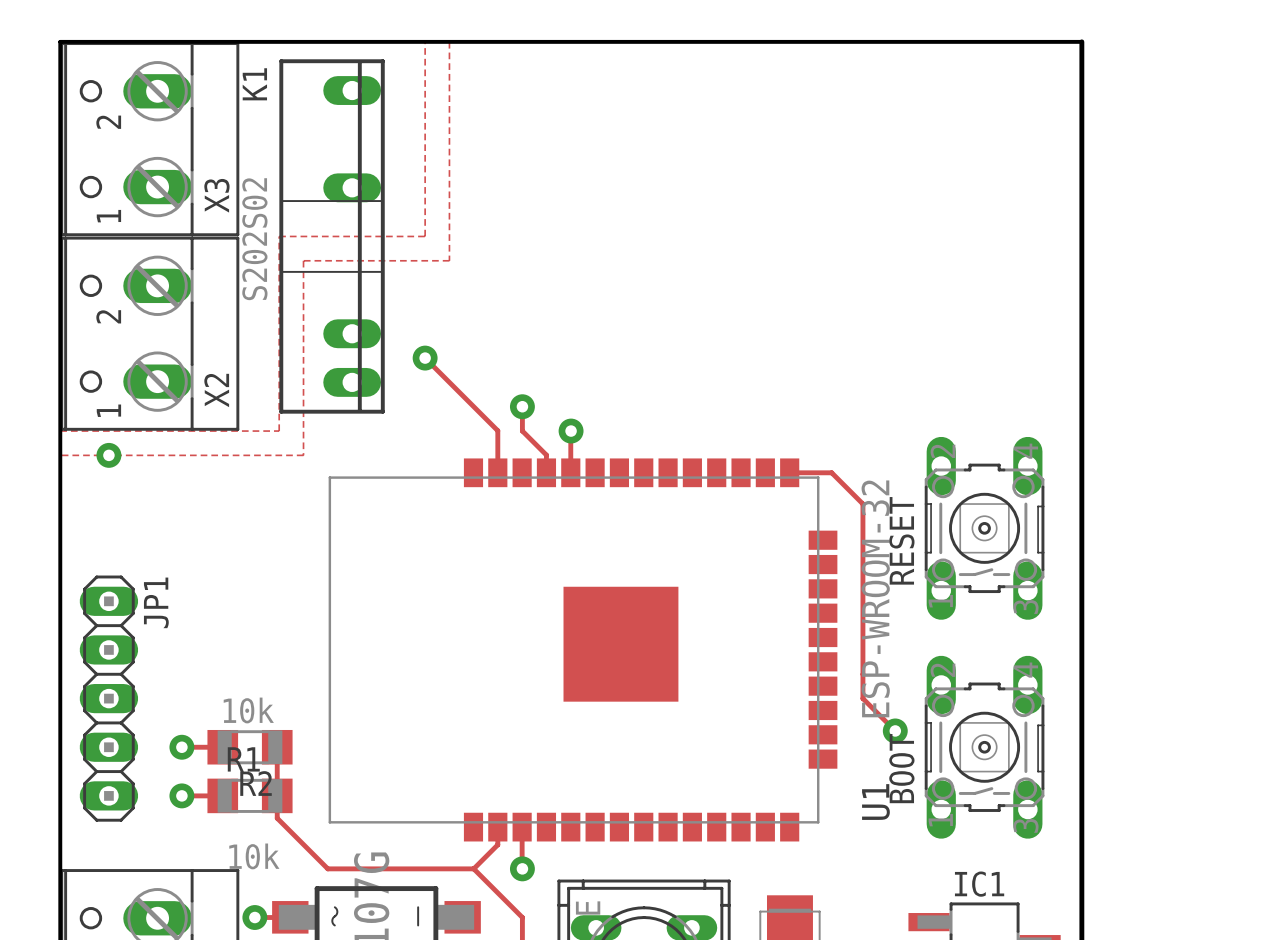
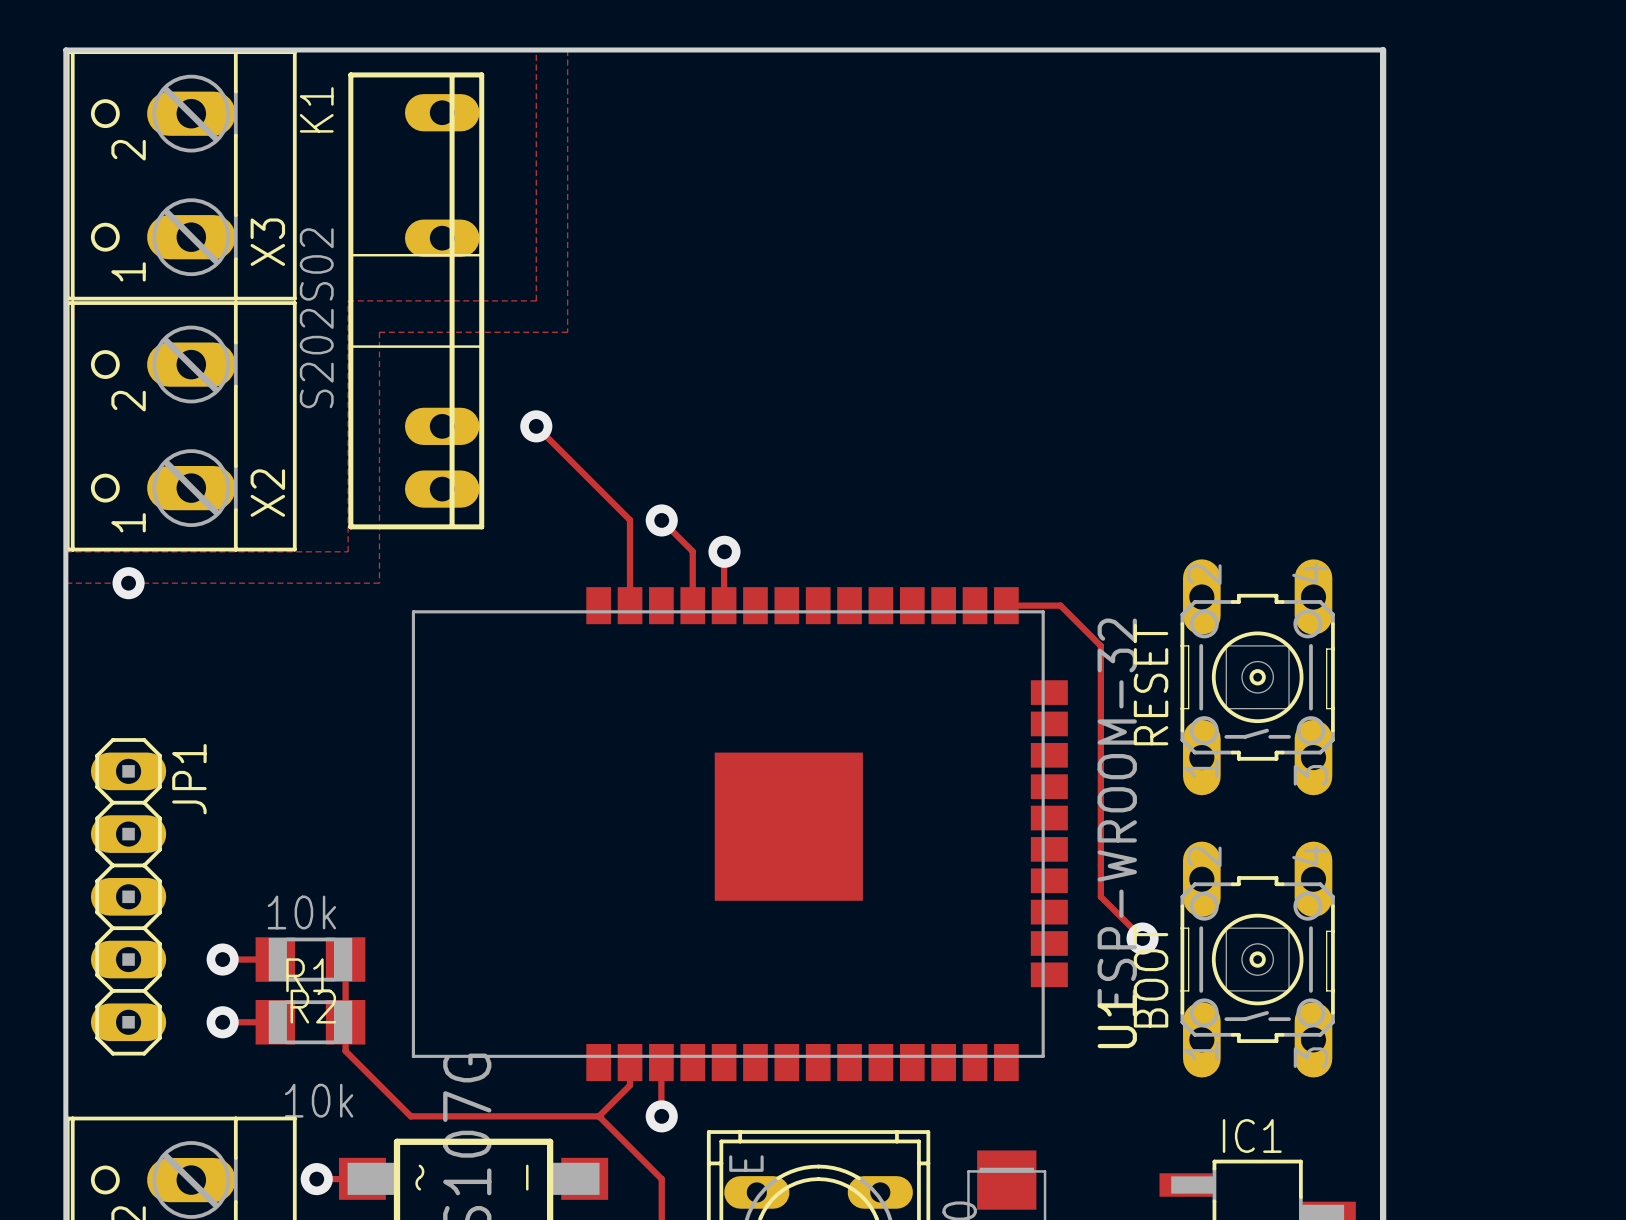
track: (425, 358) (497, 430) -> (536, 426) (630, 520) (630, 551)
via position: (425, 358) -> (536, 426)
track: (522, 406) (522, 431) (546, 455) -> (661, 520) (692, 551) (692, 582)

